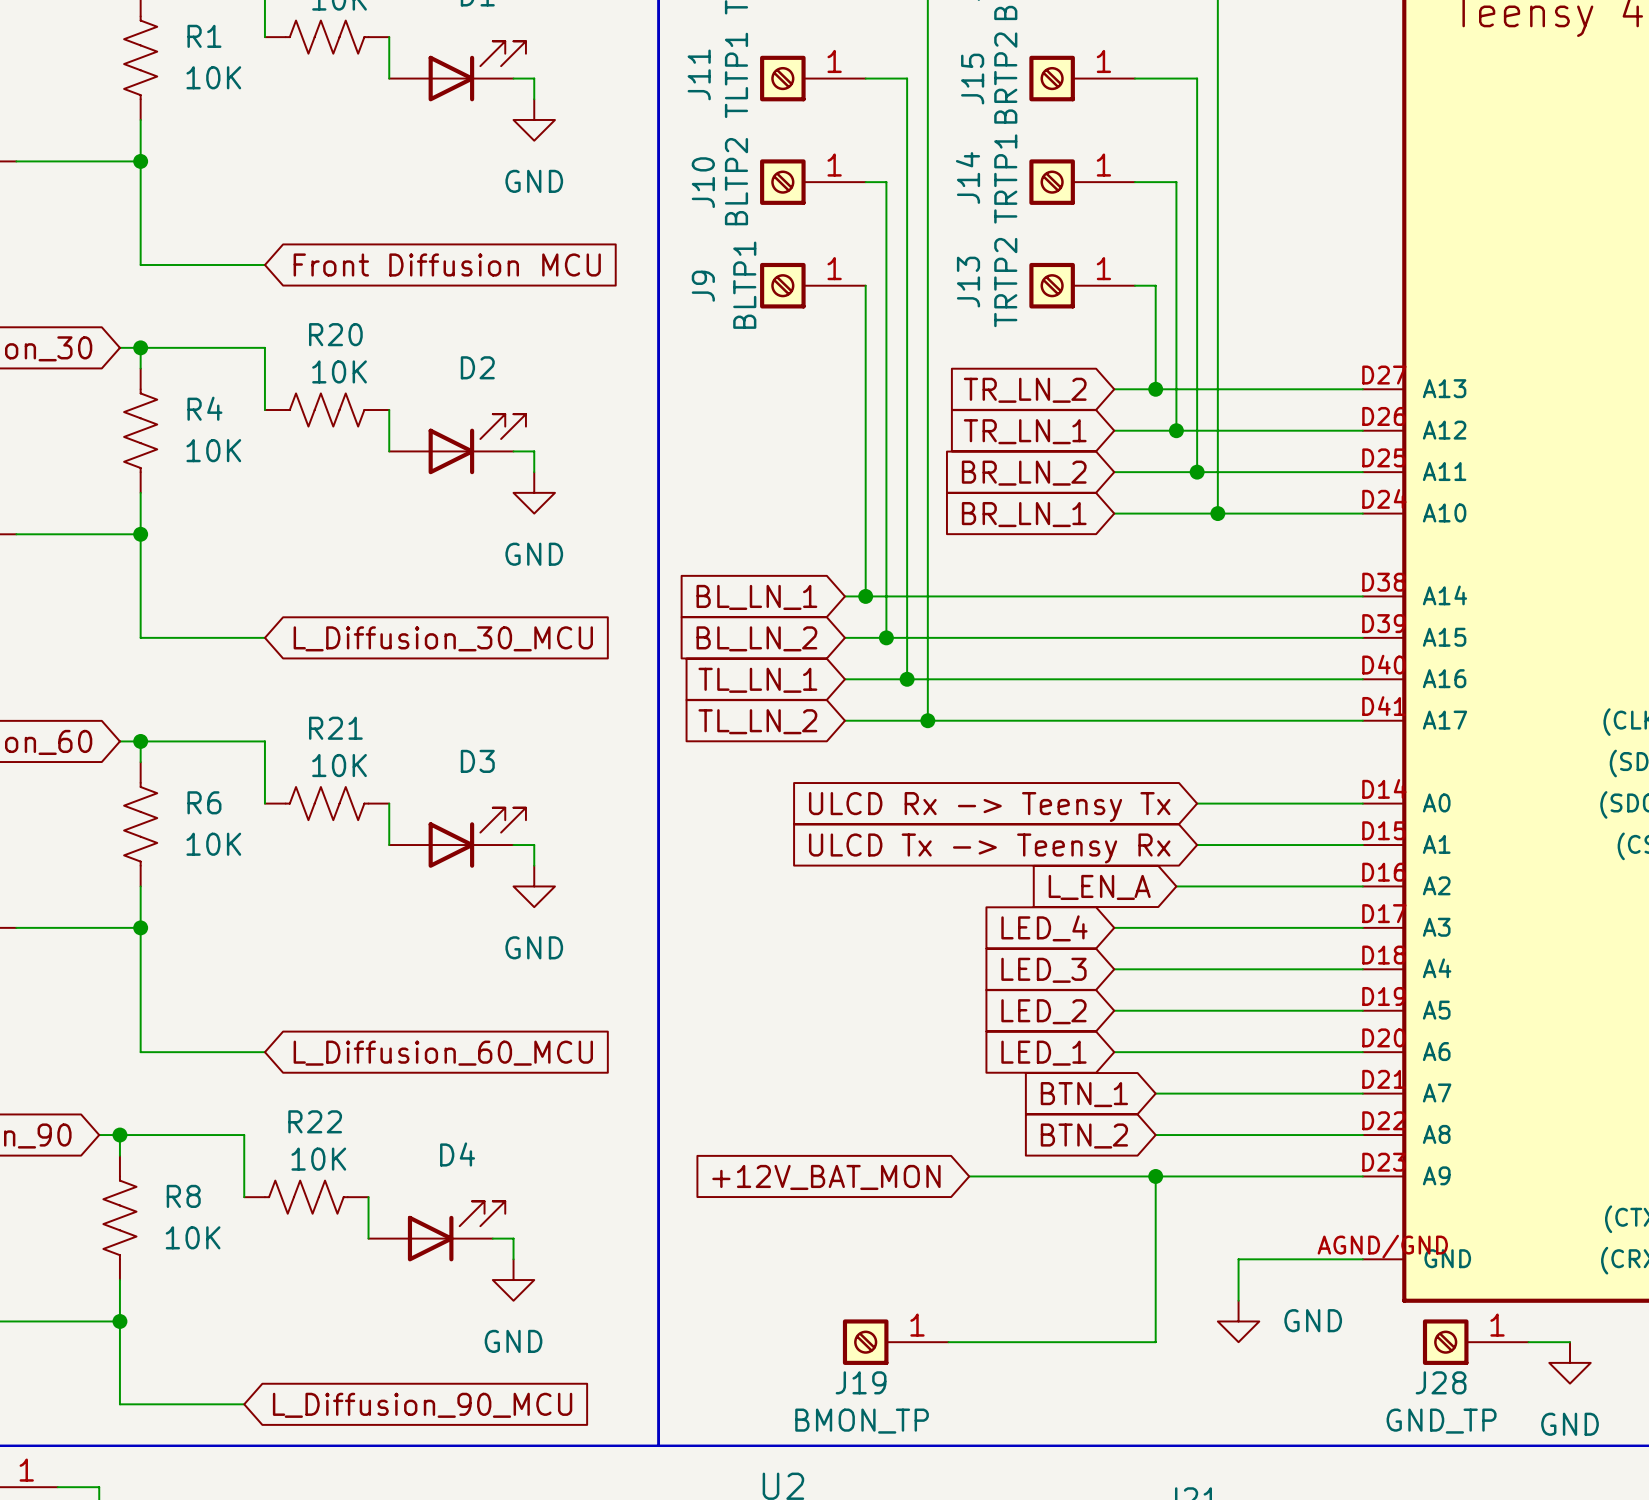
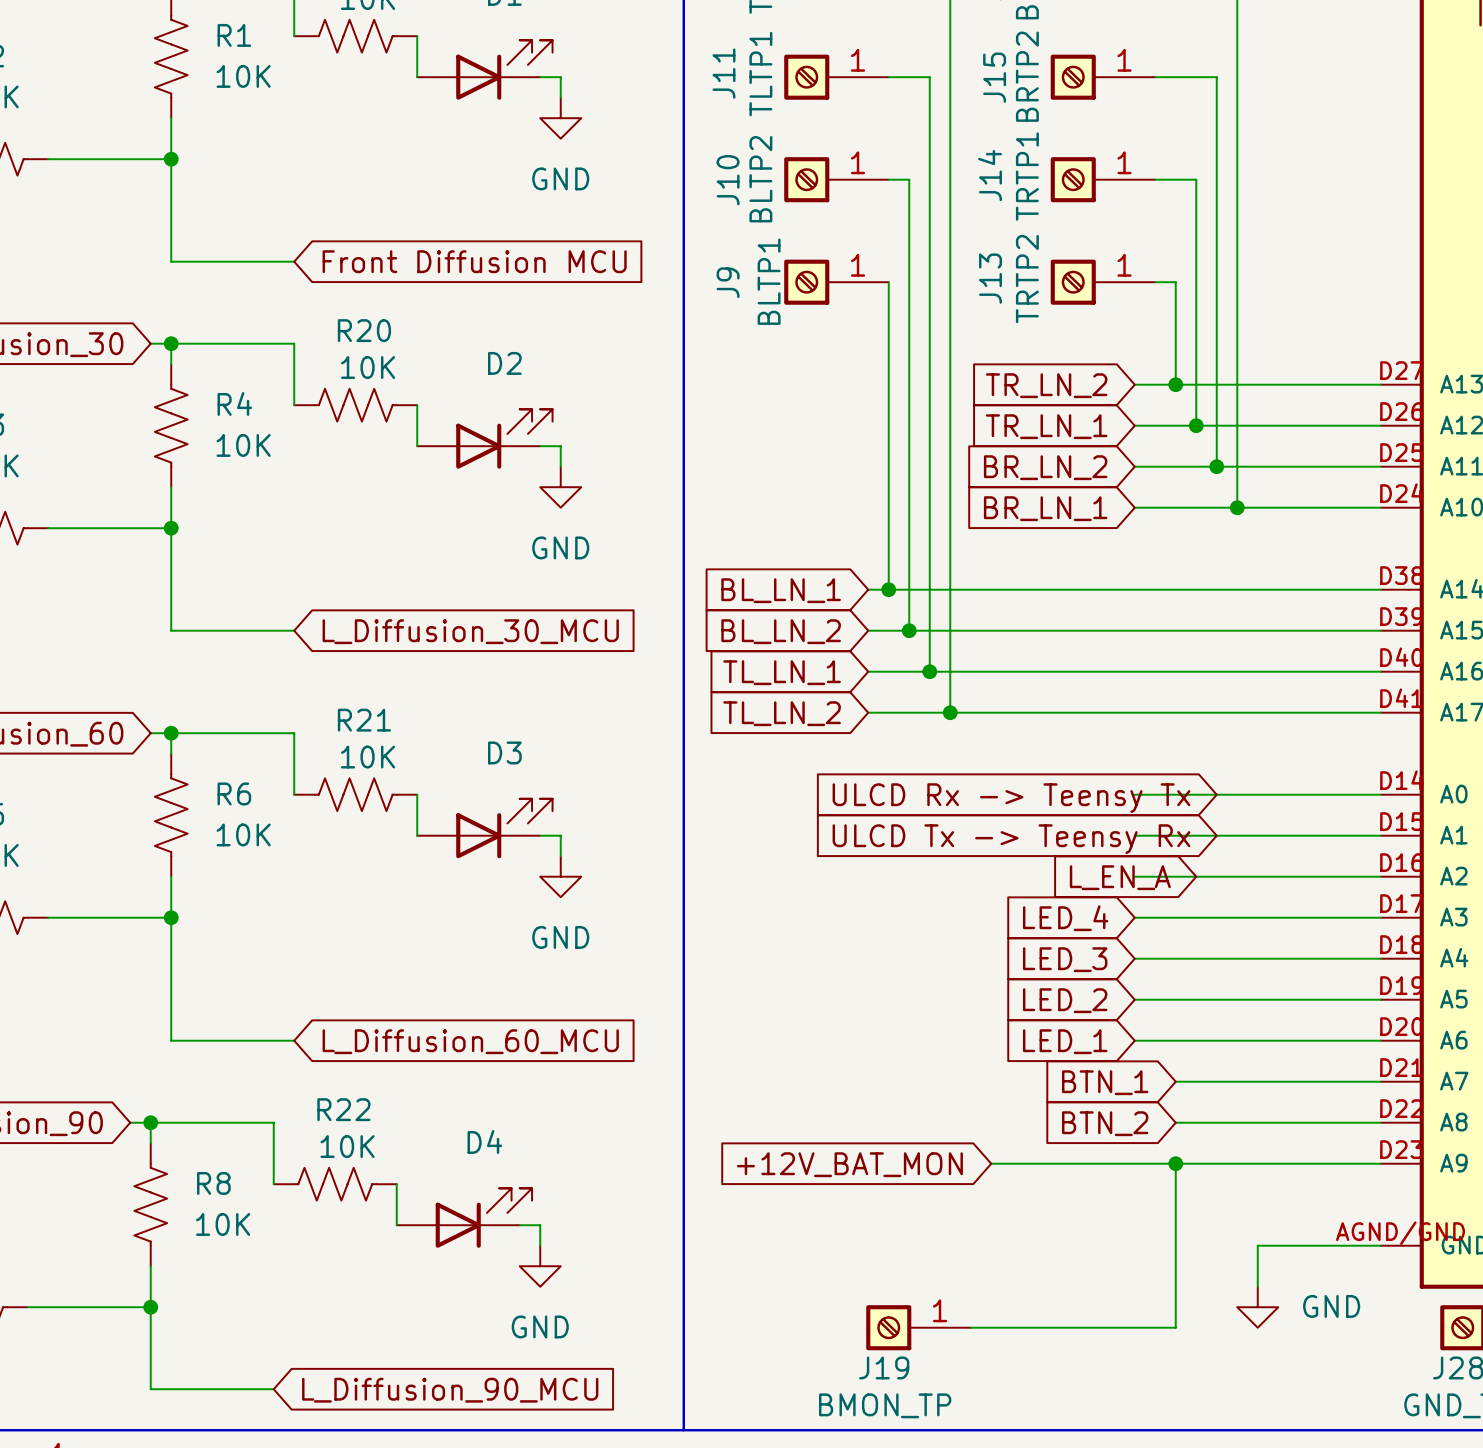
wire: none -> (1134, 794) (1216, 794)
wire: none -> (1134, 835) (1216, 835)
wire: none -> (1134, 876) (1196, 876)

